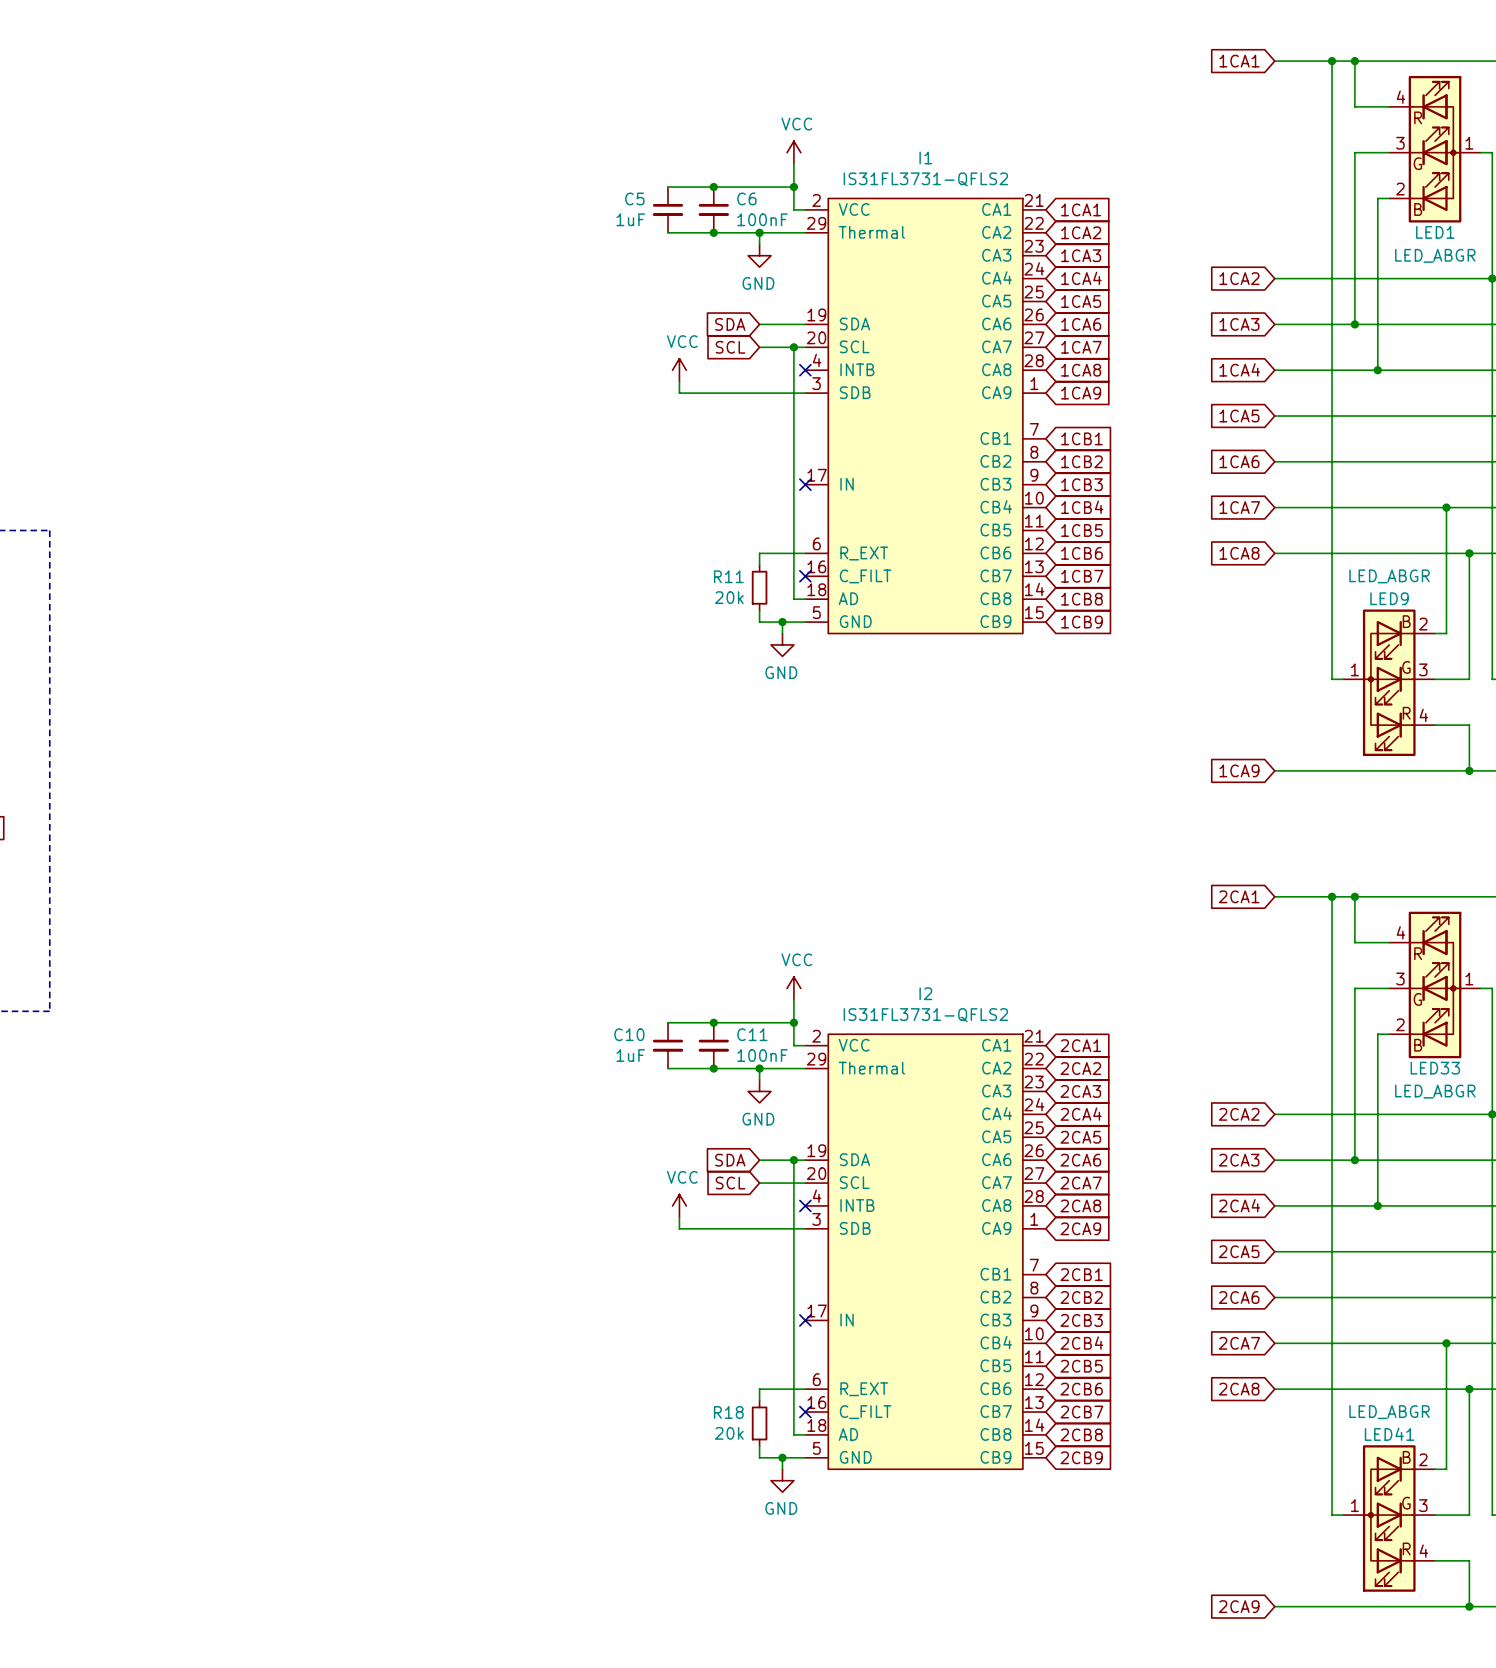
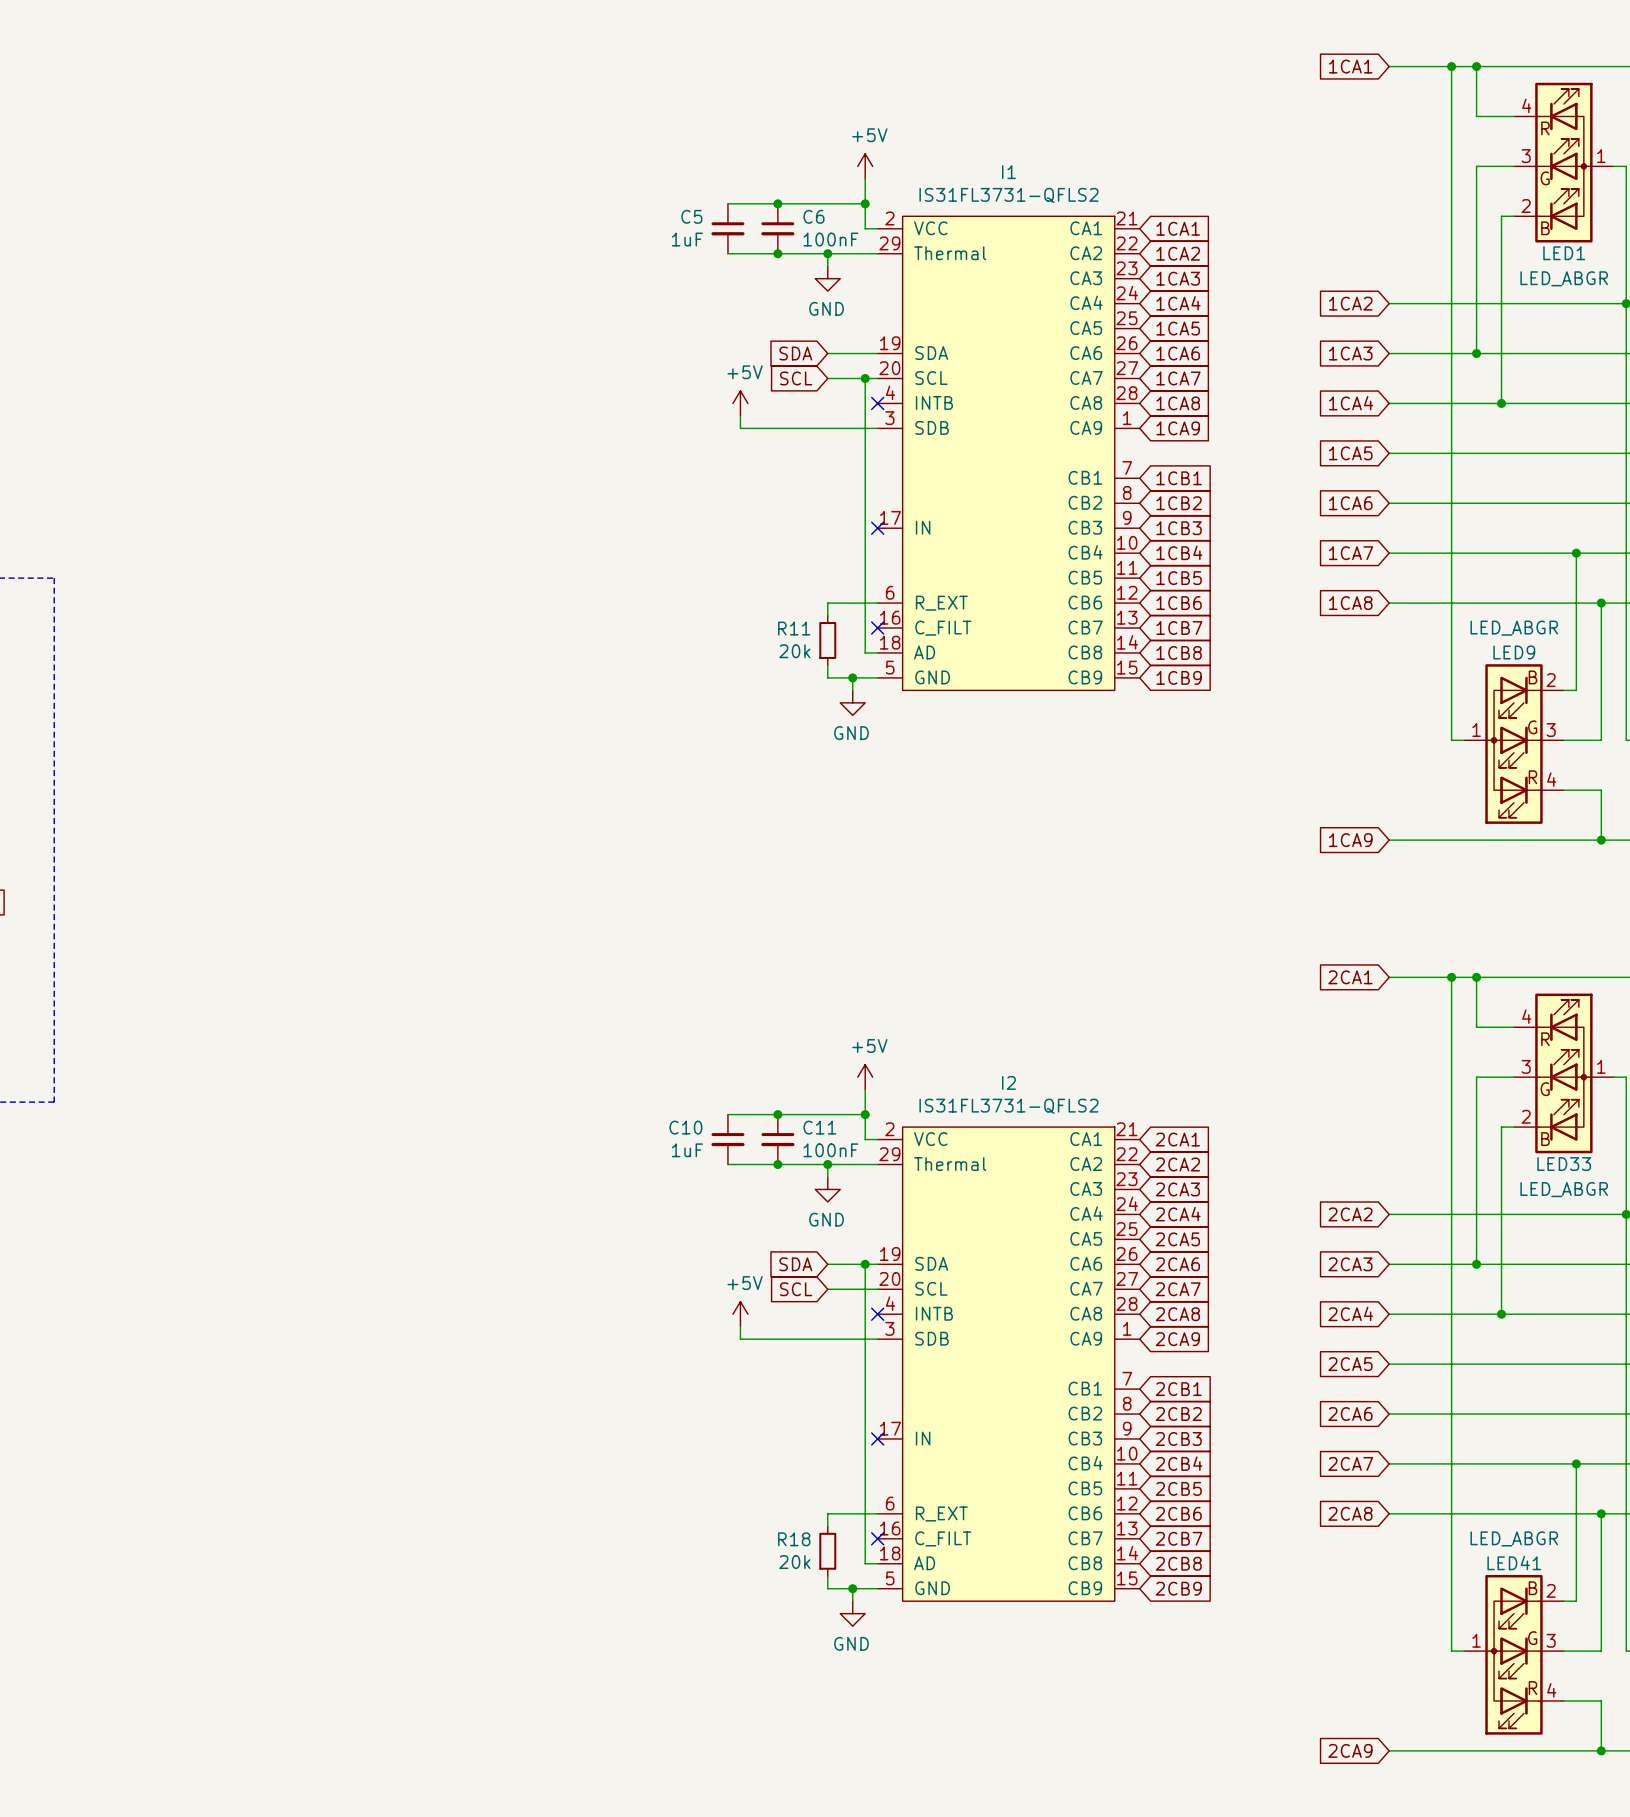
power symbol: VCC (793, 152) -> +5V (865, 166)
power symbol: VCC (679, 370) -> +5V (740, 403)
power symbol: VCC (793, 988) -> +5V (865, 1077)
power symbol: VCC (679, 1205) -> +5V (740, 1314)

